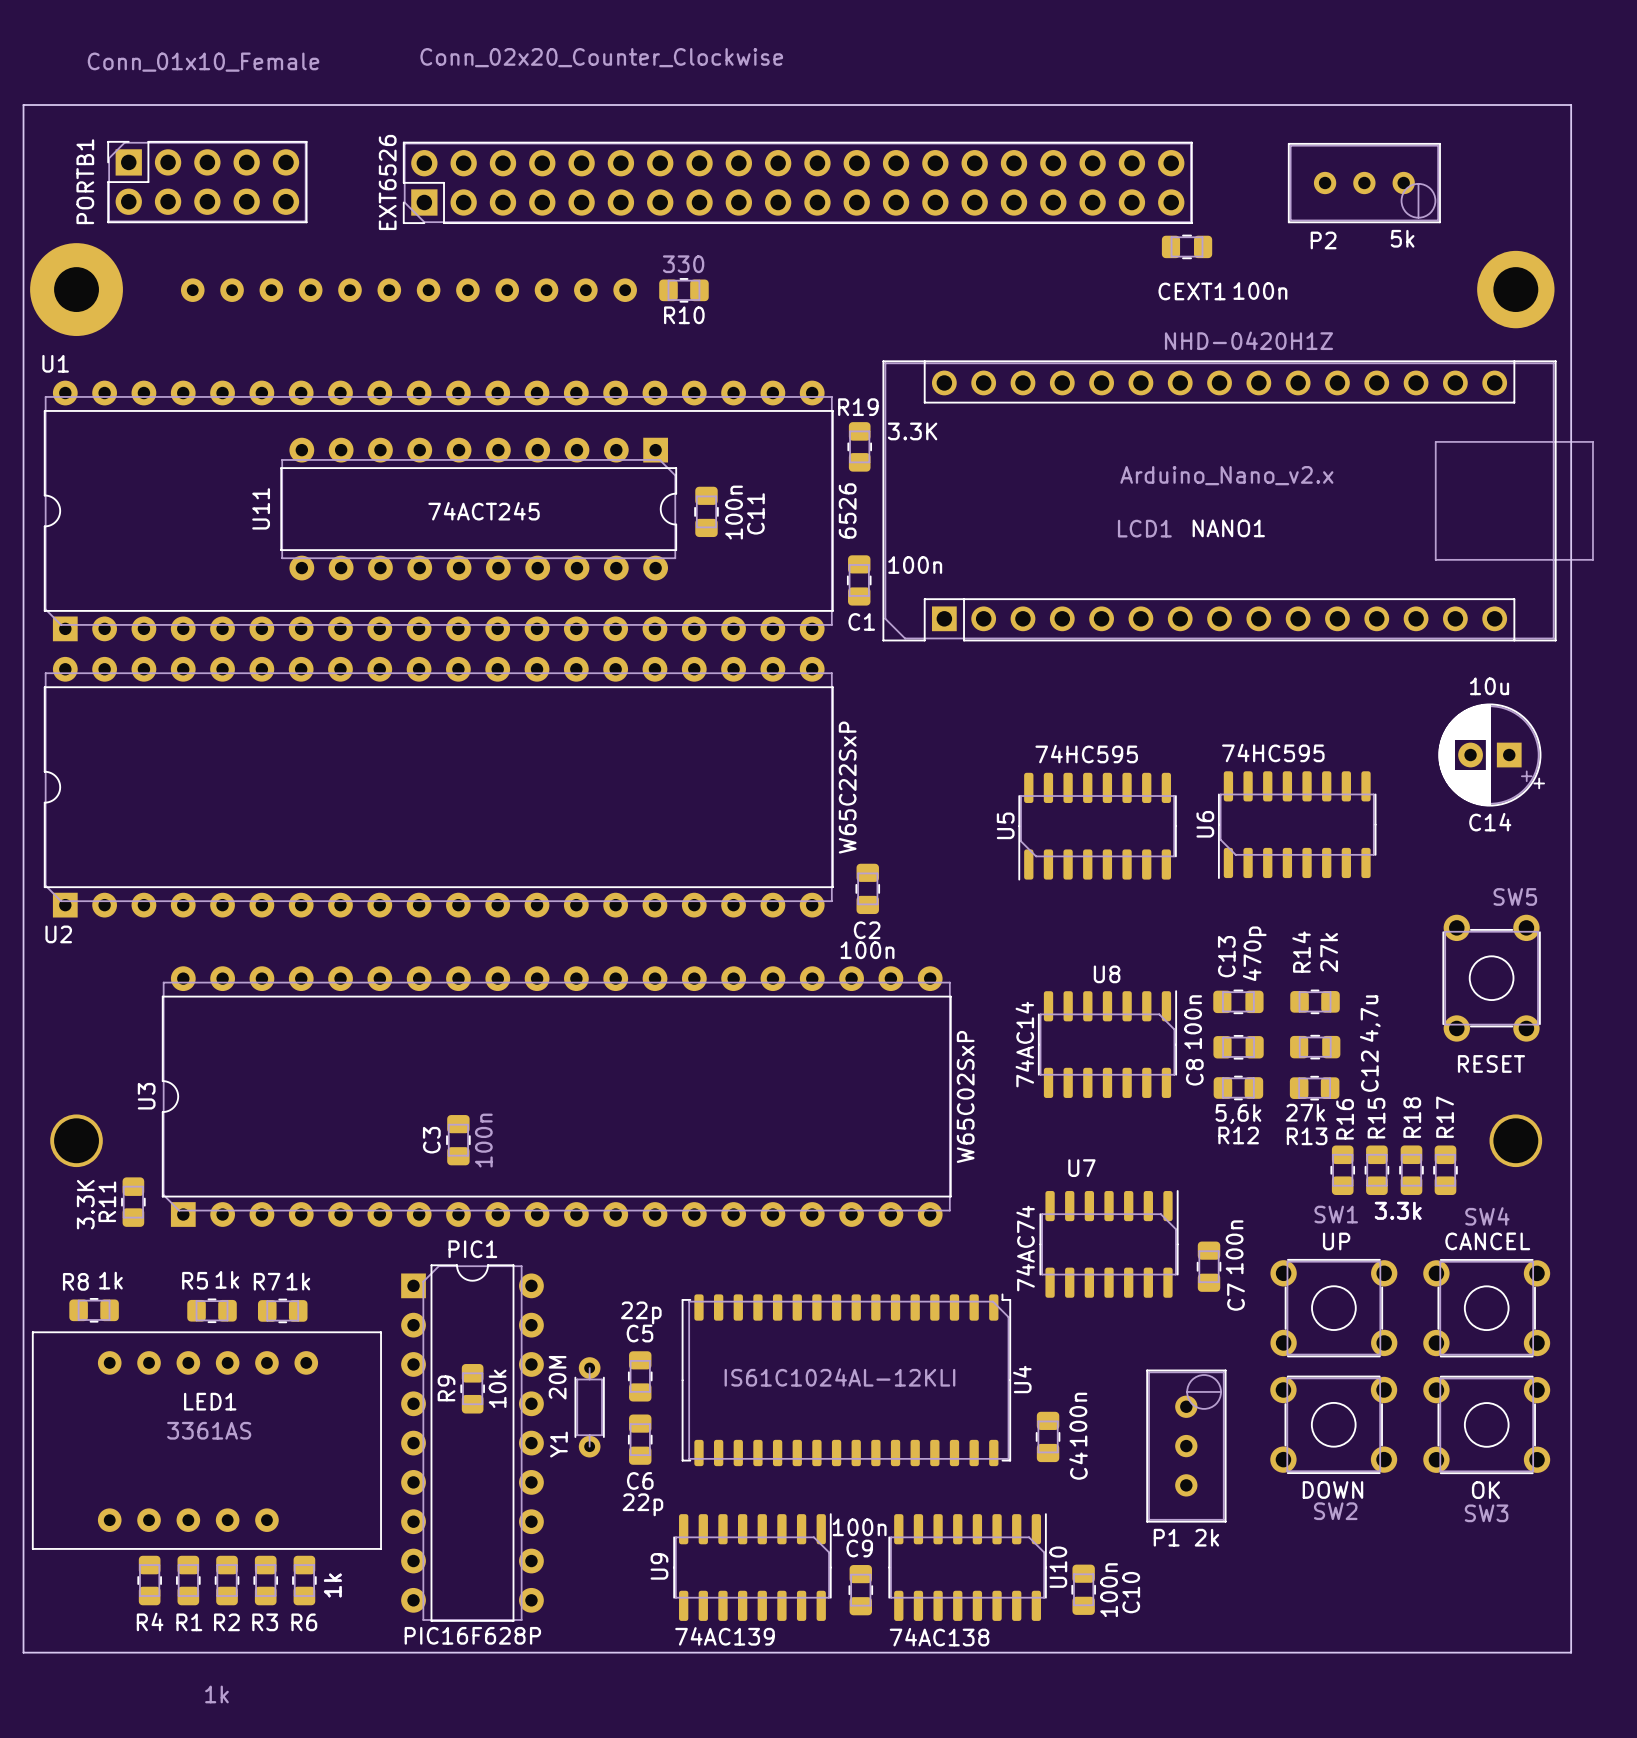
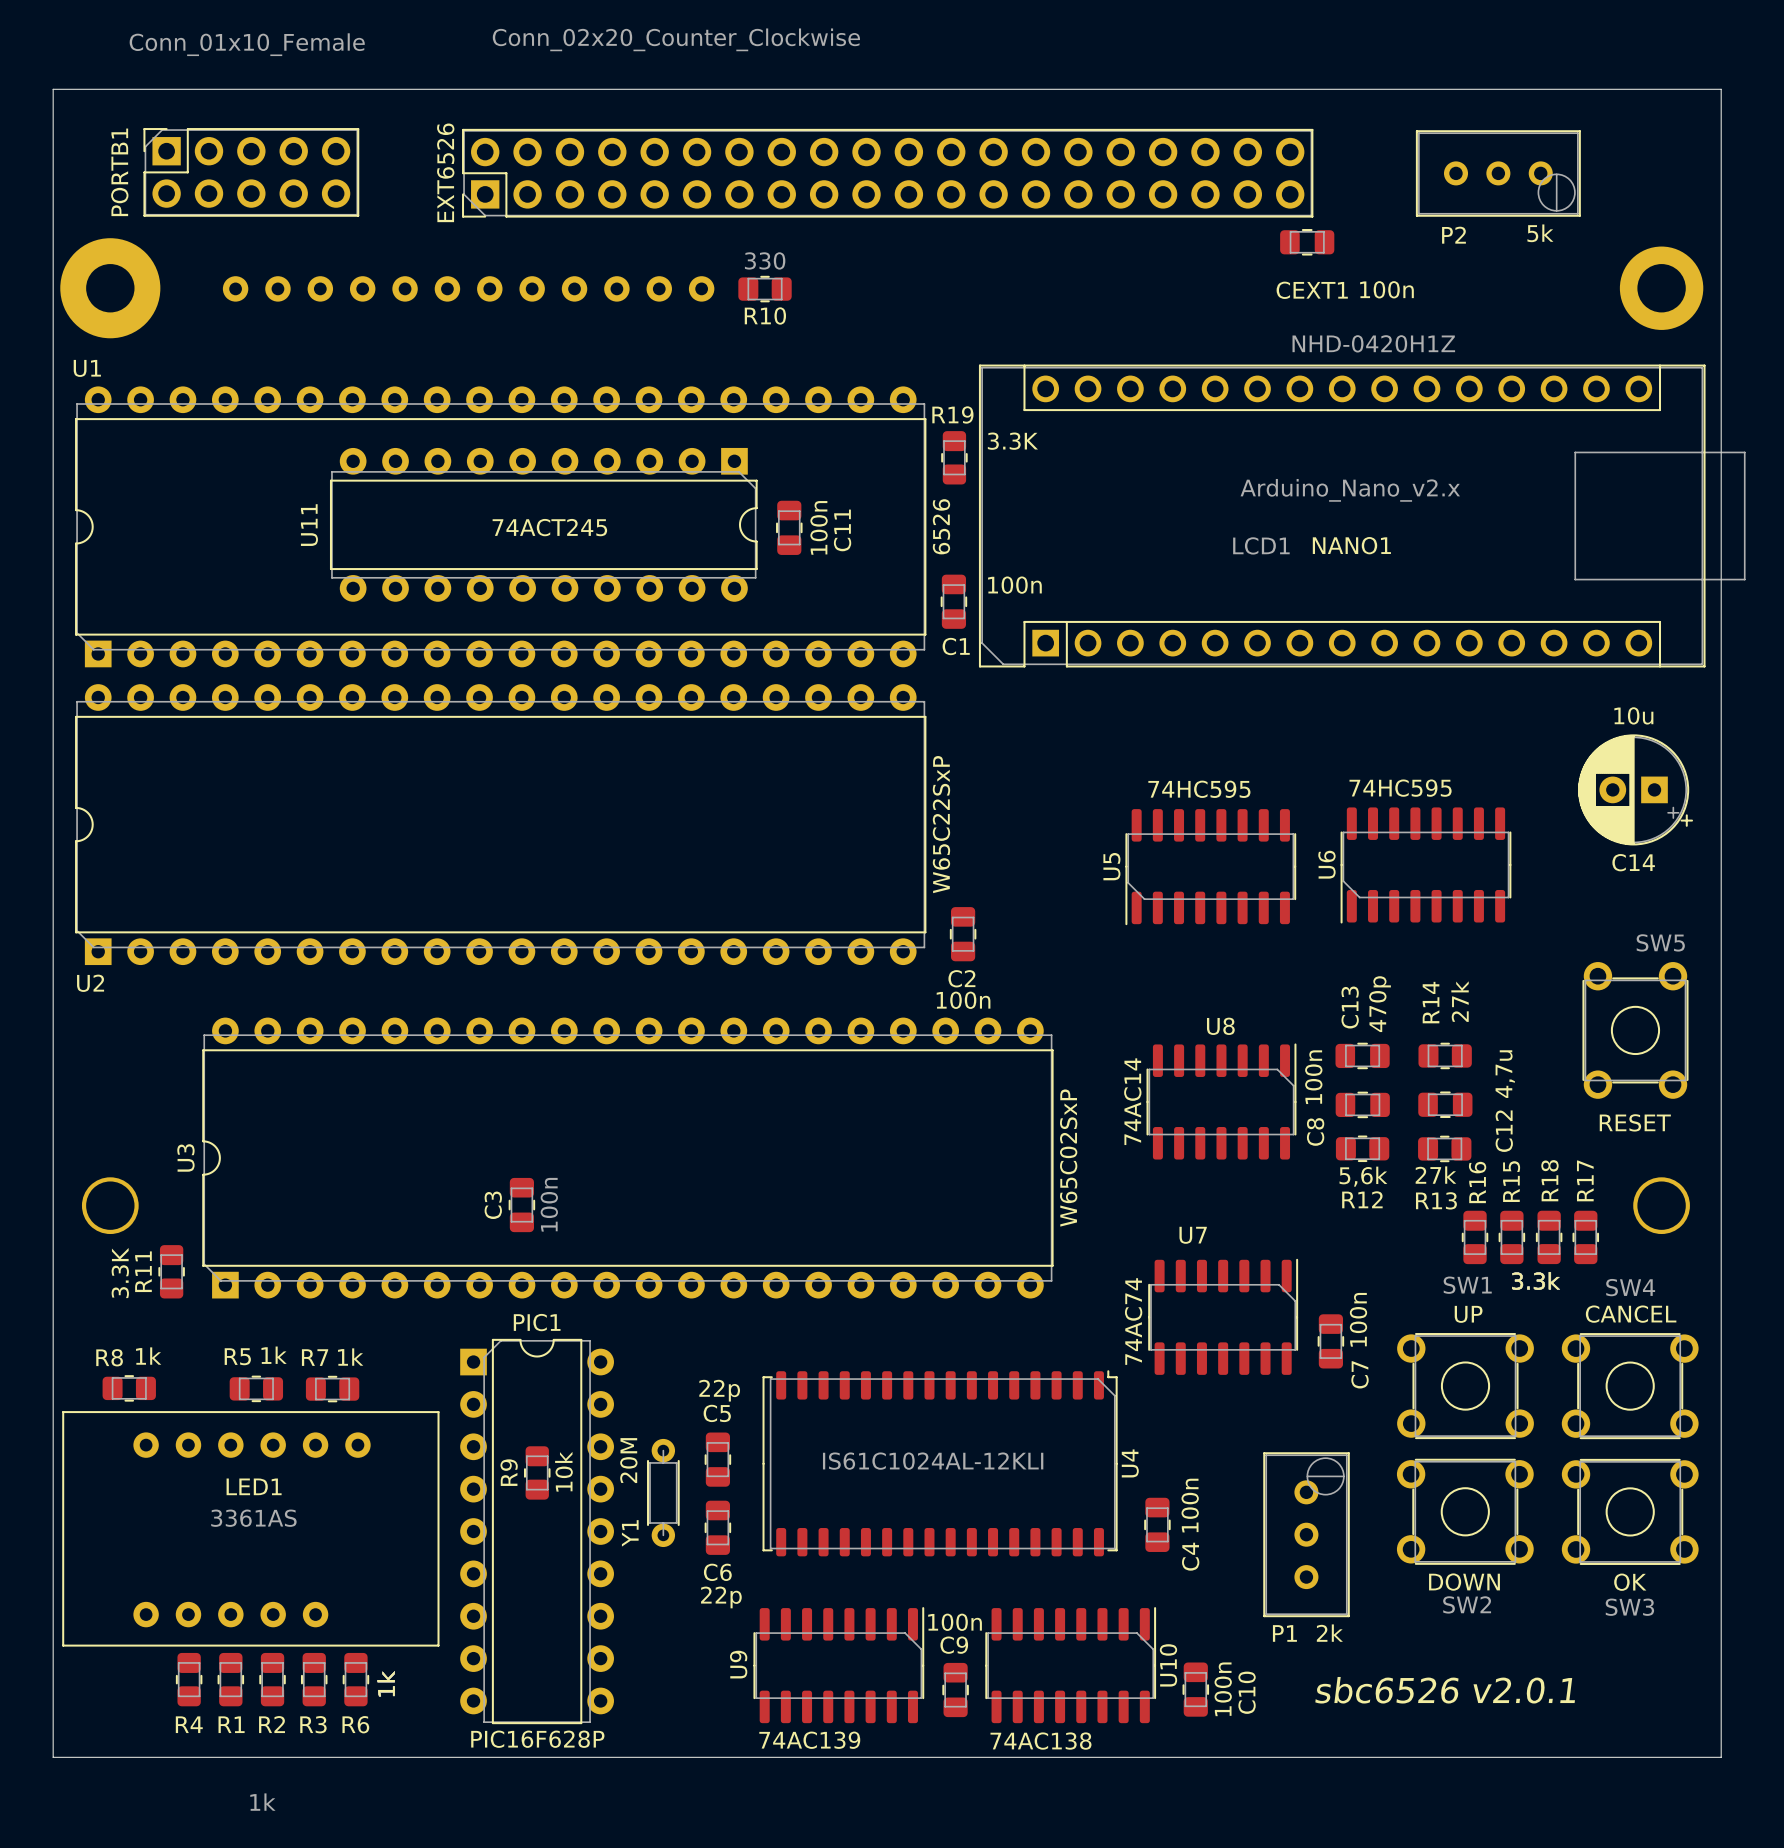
text: none -> sbc6526 v2.0.1 (1445, 1690)

